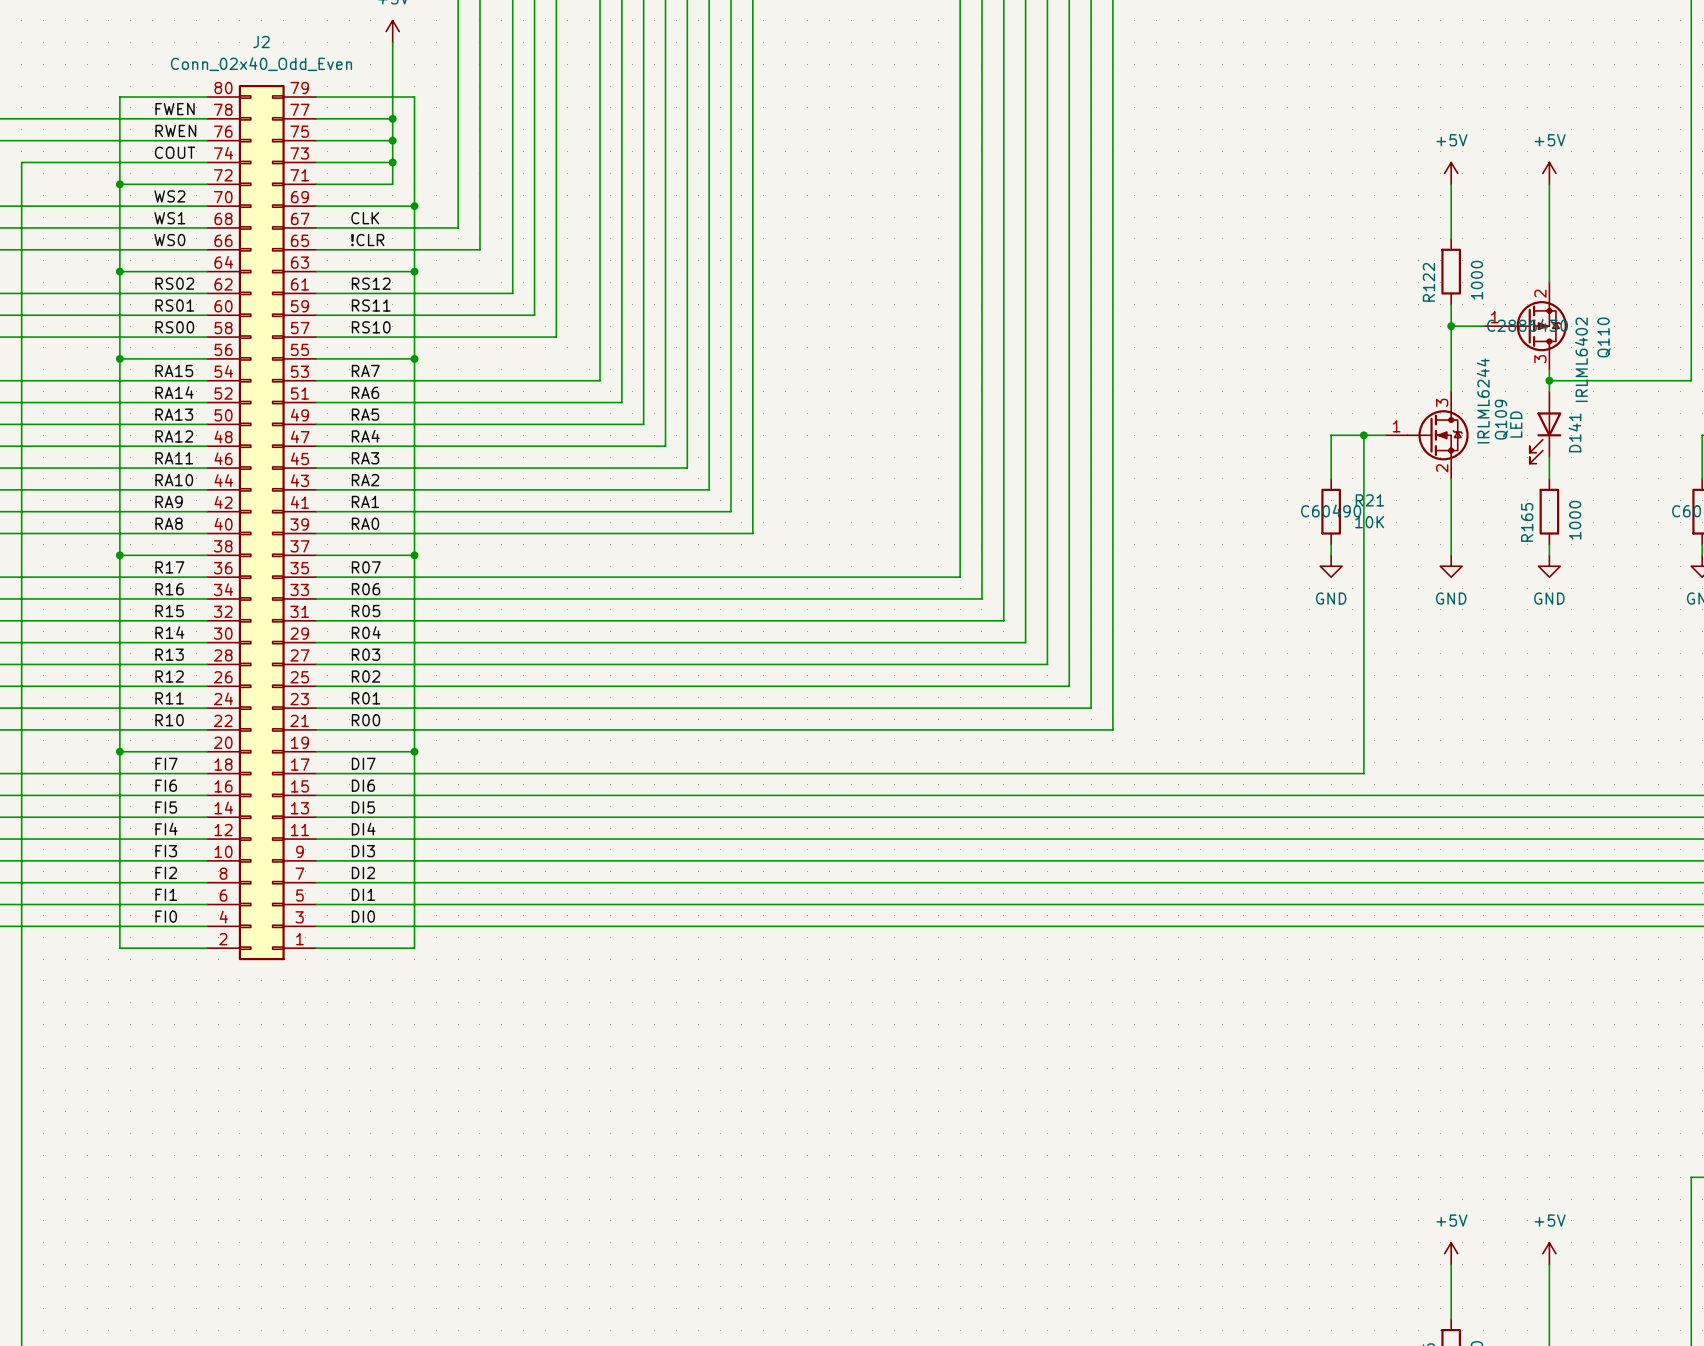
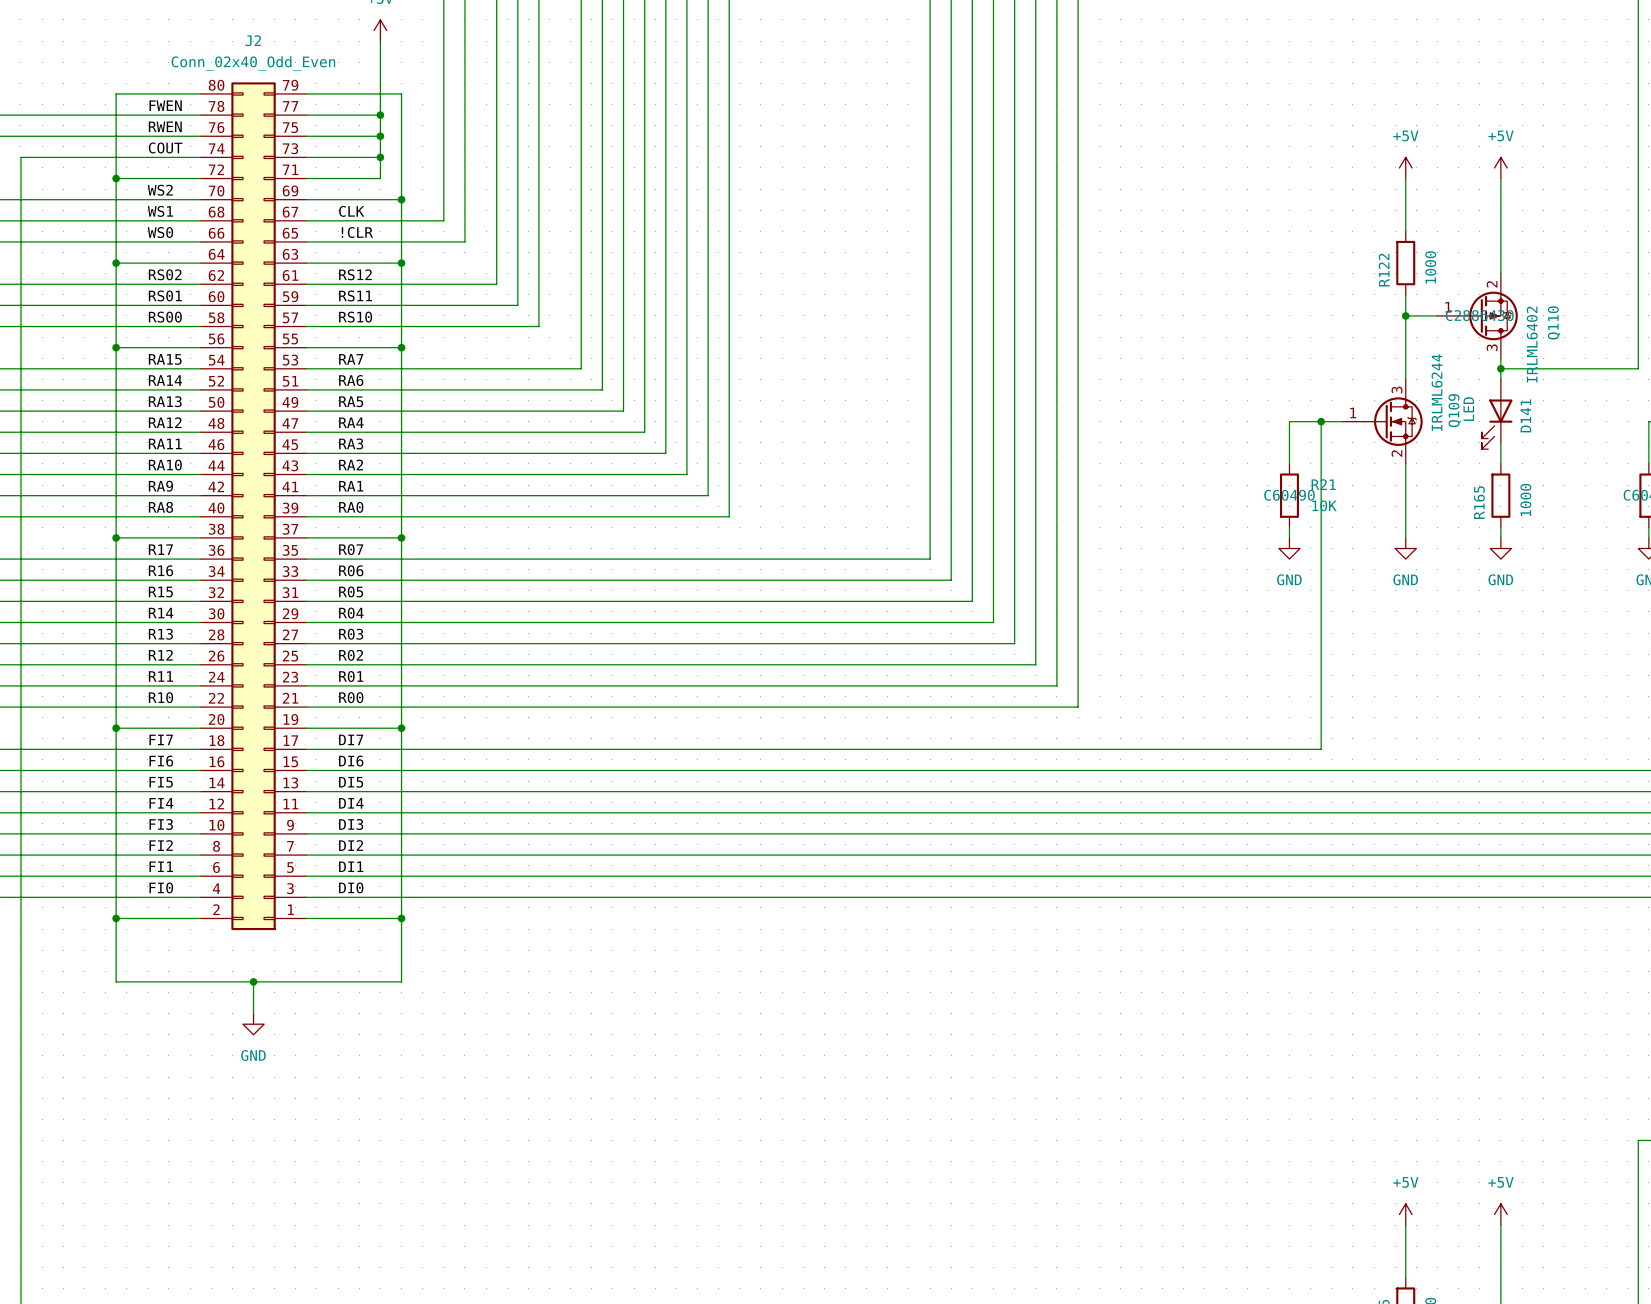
wire: none -> (116, 918) (116, 981) (401, 981) (401, 918)
junction: none -> (116, 918)
junction: none -> (401, 918)
wire: none -> (253, 981) (253, 1013)
junction: none -> (253, 981)
power symbol: none -> GND (253, 1024)

